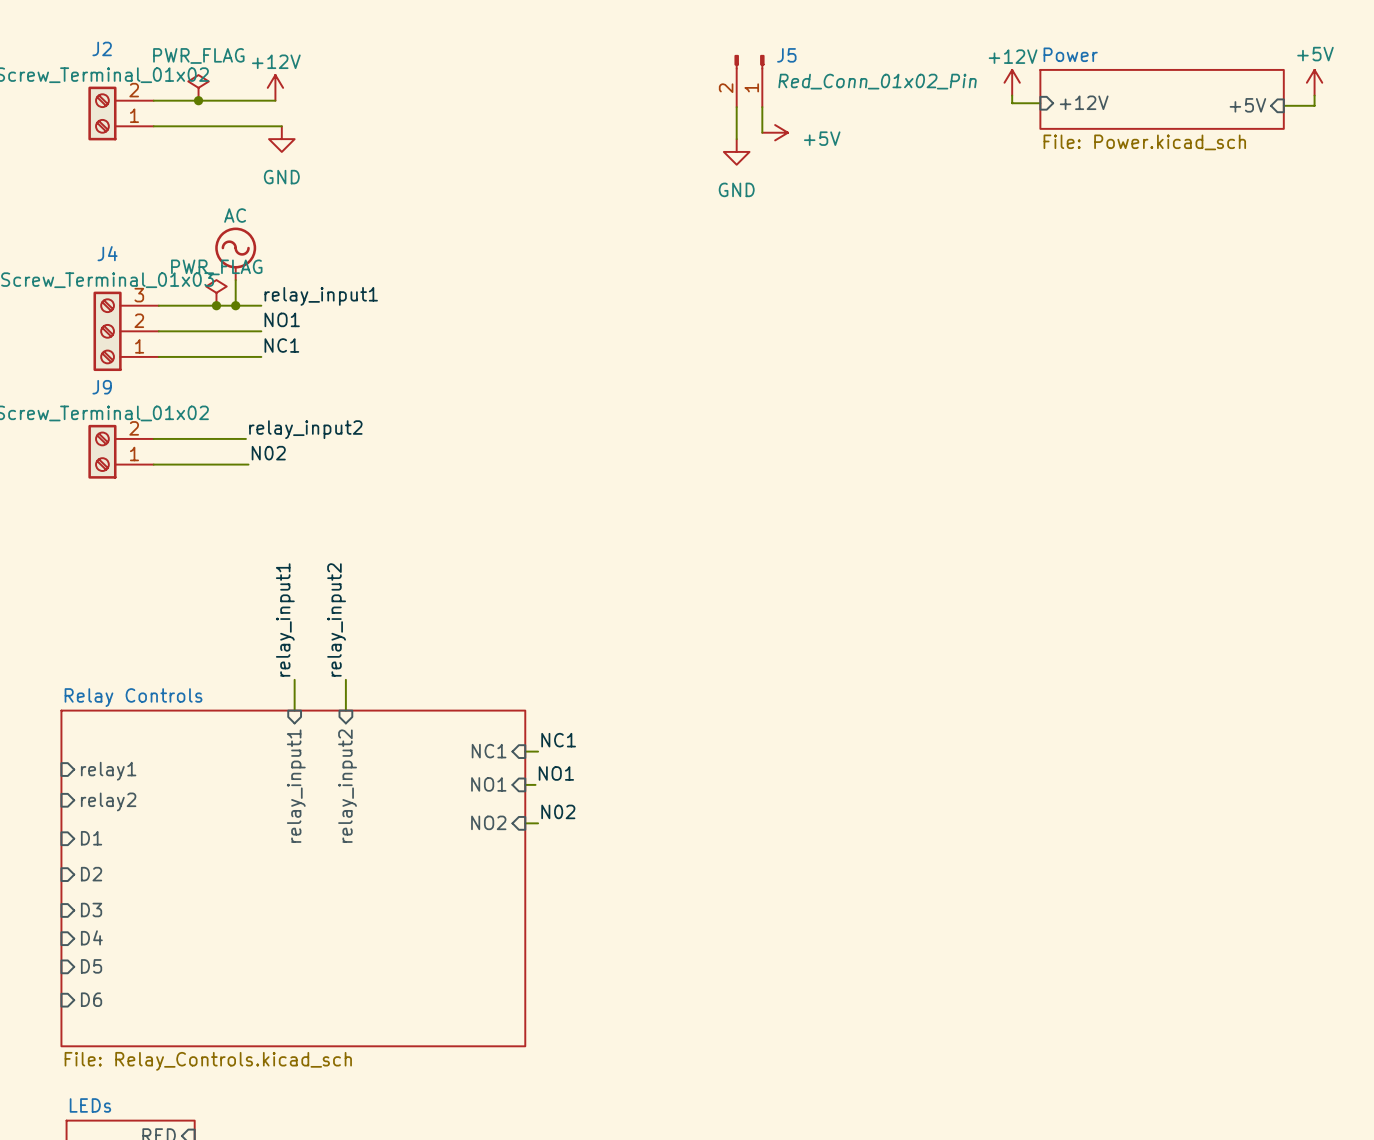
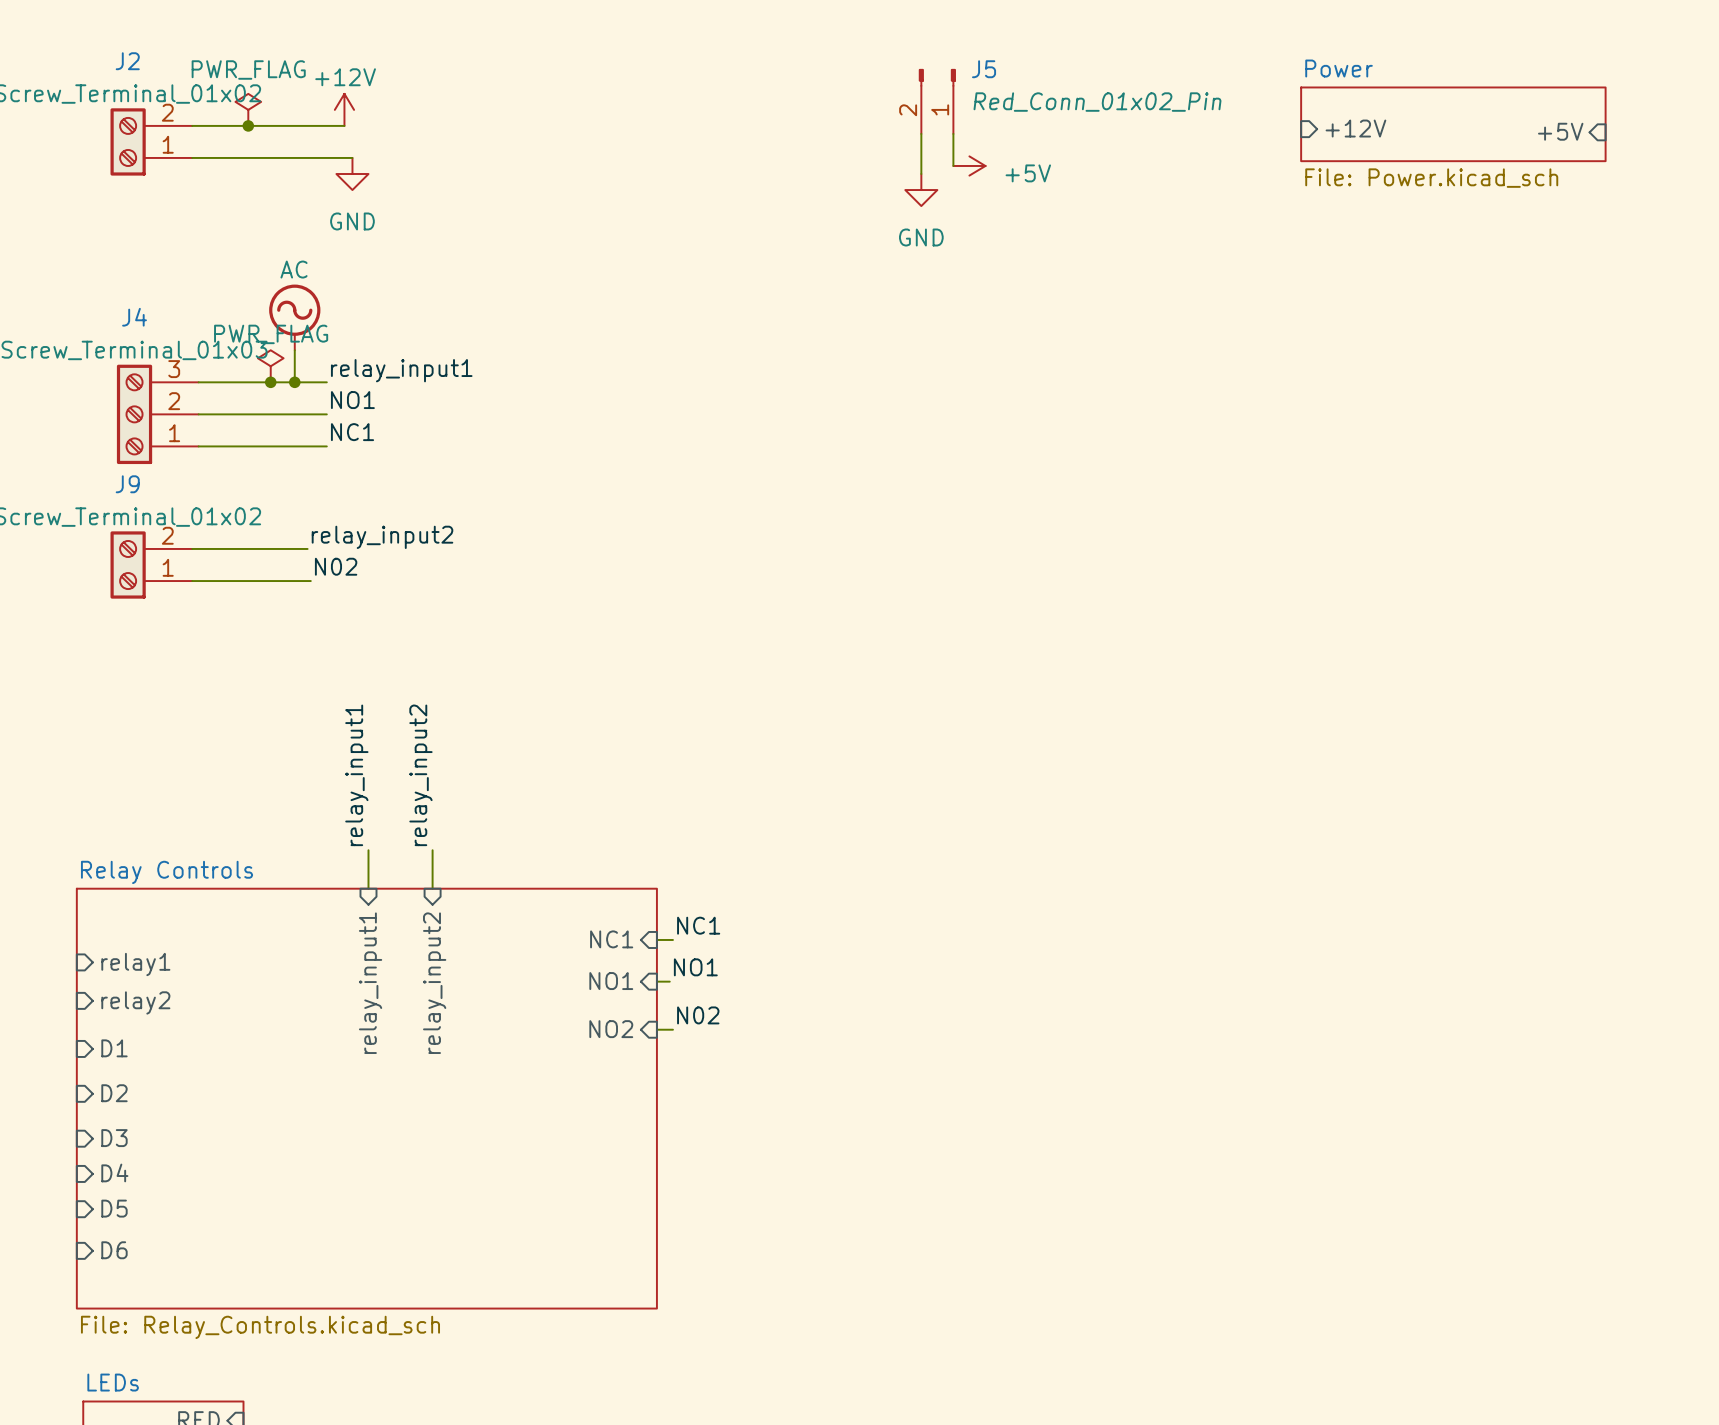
power symbol: +12V (1012, 82) -> none
power symbol: +5V (1314, 82) -> none
wire: (1012, 95) (1012, 103) (1040, 103) -> none
wire: (1314, 95) (1314, 105) (1283, 105) -> none

